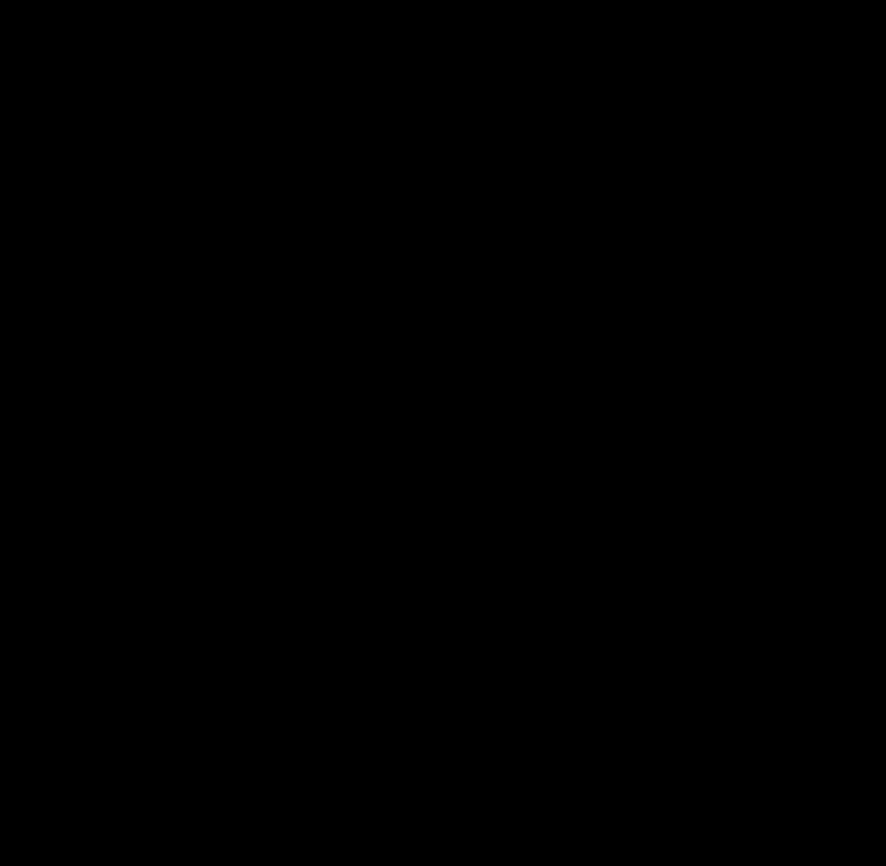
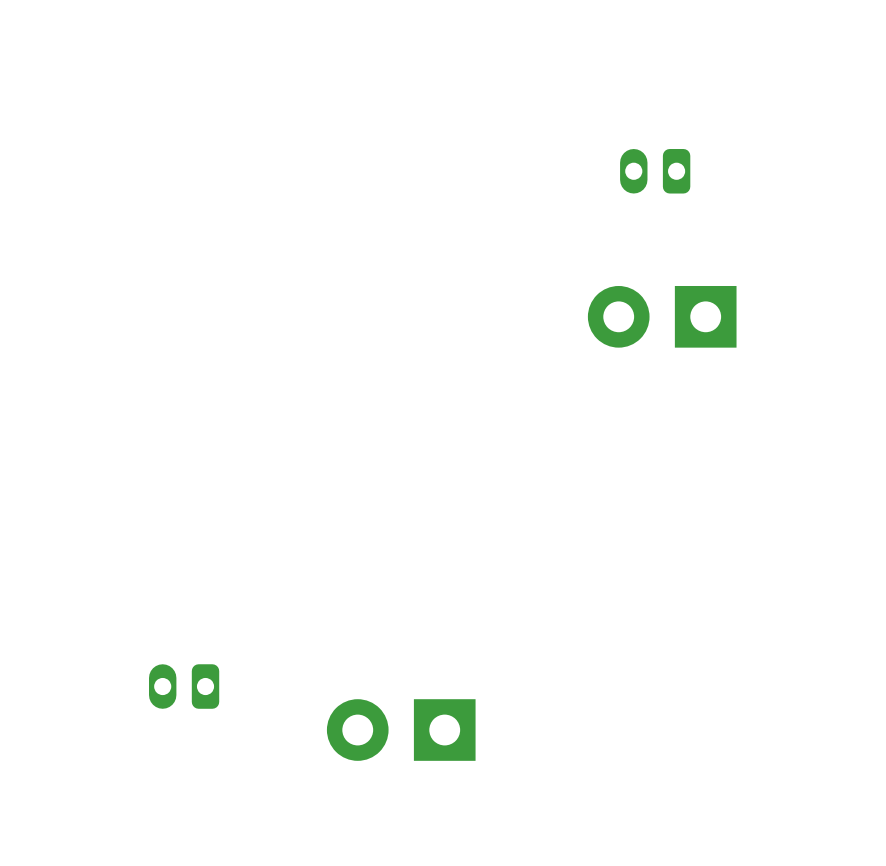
part: none -> (655, 171)
part: none -> (662, 316)
part: none -> (184, 686)
part: none -> (401, 730)

